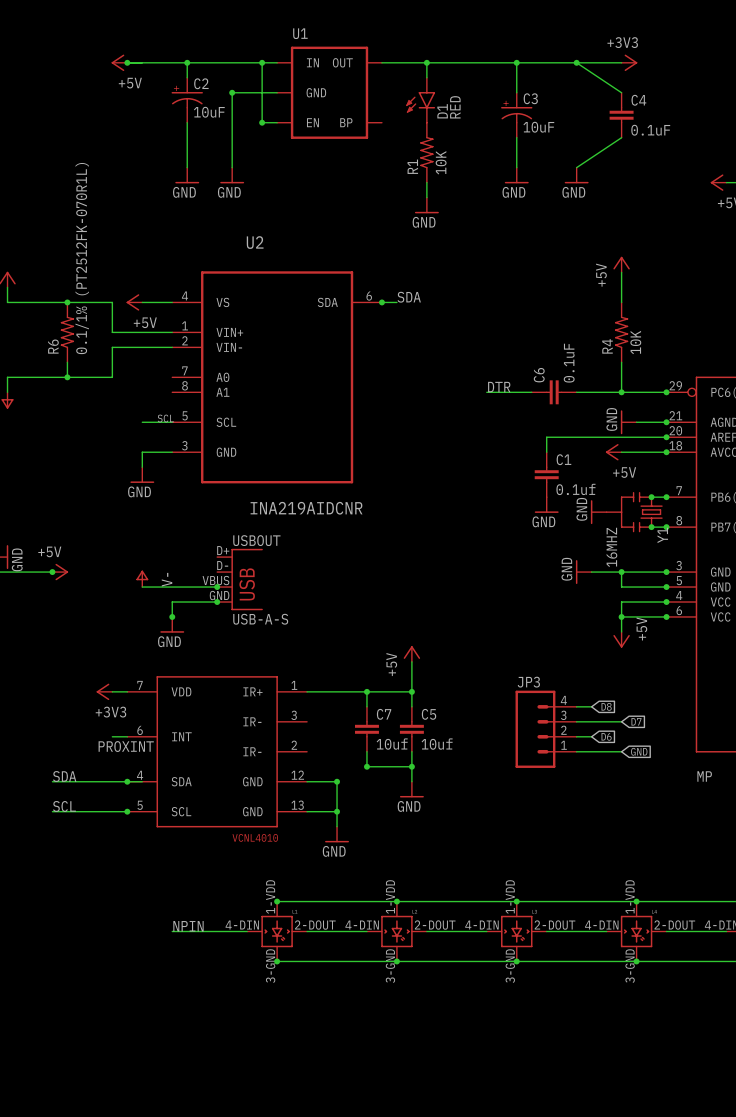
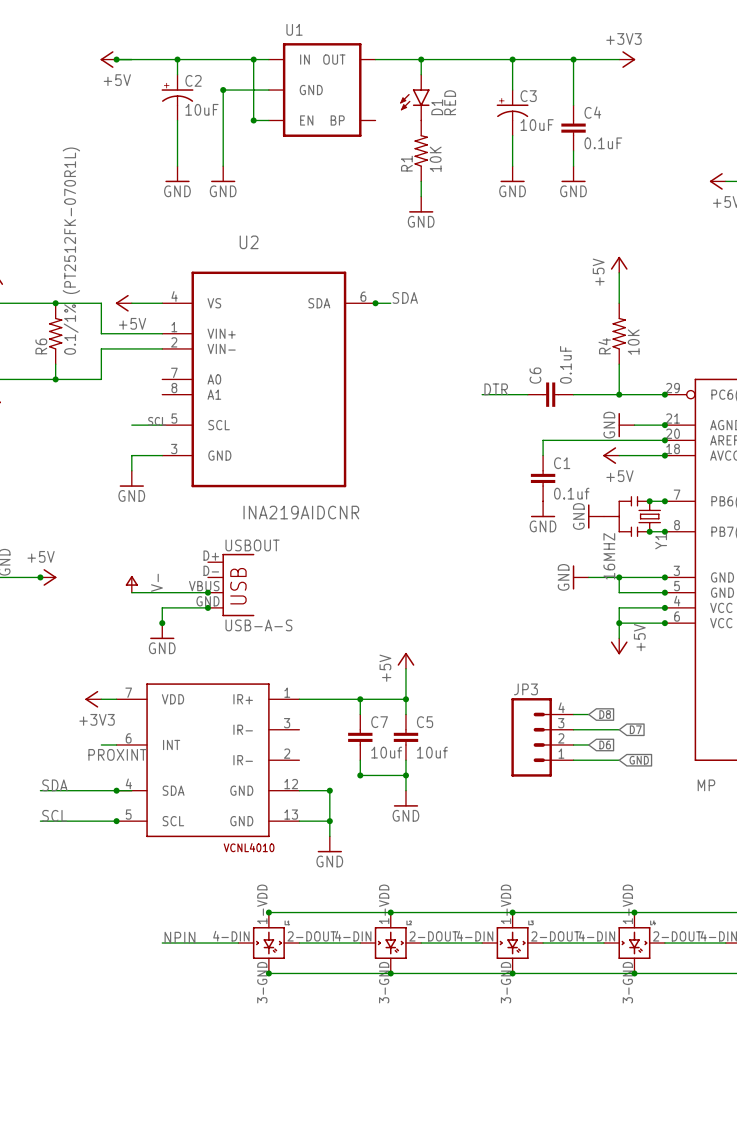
wire: (576, 62) (621, 92) -> (573, 59) (573, 105)
C4 position: (621, 115) -> (573, 128)
wire: (621, 137) (576, 167) -> (573, 150) (573, 166)

